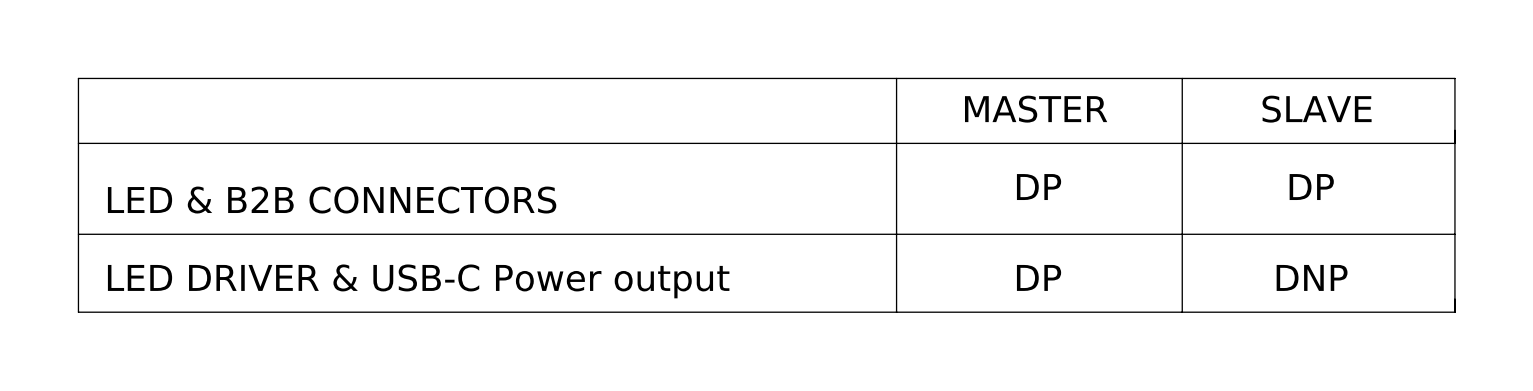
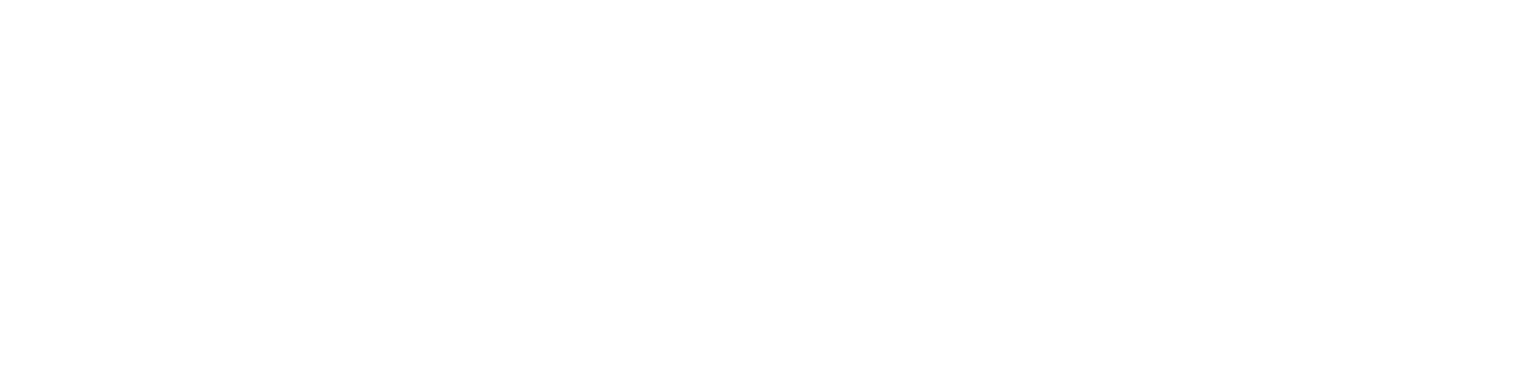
line: (78, 78) (1454, 78) (1454, 312) (78, 312) (78, 78) -> none
line: (896, 78) (896, 312) -> none
line: (1182, 78) (1182, 312) -> none
text: MASTER (1036, 109) -> none
text: SLAVE (1317, 109) -> none
line: (78, 143) (1454, 143) -> none
text: DP (1039, 187) -> none
text: DP (1311, 187) -> none
text: LED & B2B CONNECTORS (332, 200) -> none
line: (78, 234) (1454, 234) -> none
text: DP (1039, 277) -> none
text: DNP (1312, 277) -> none
text: LED DRIVER & USB-C Power output (418, 281) -> none

